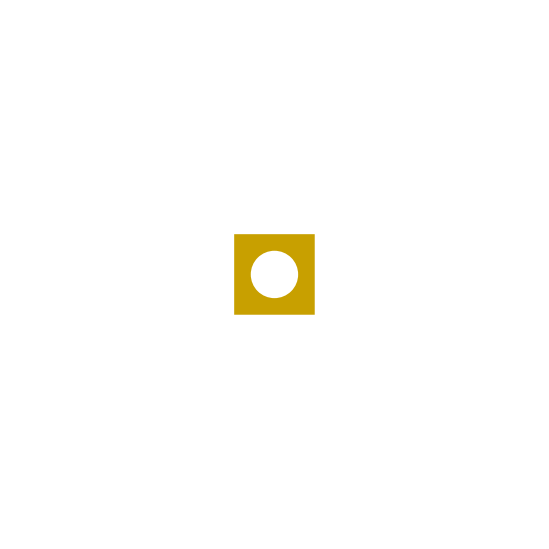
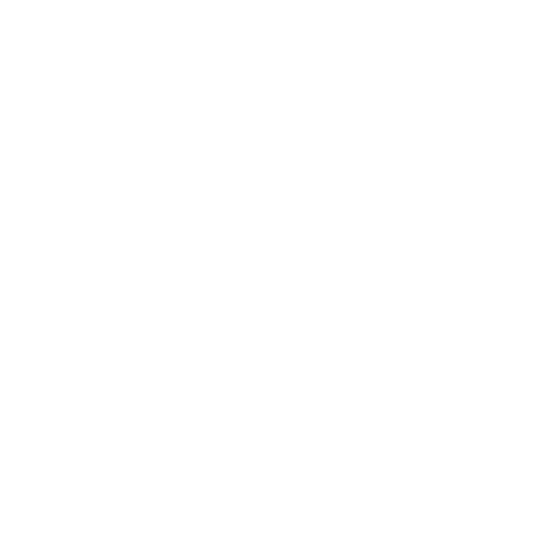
part: (274, 274) -> none

